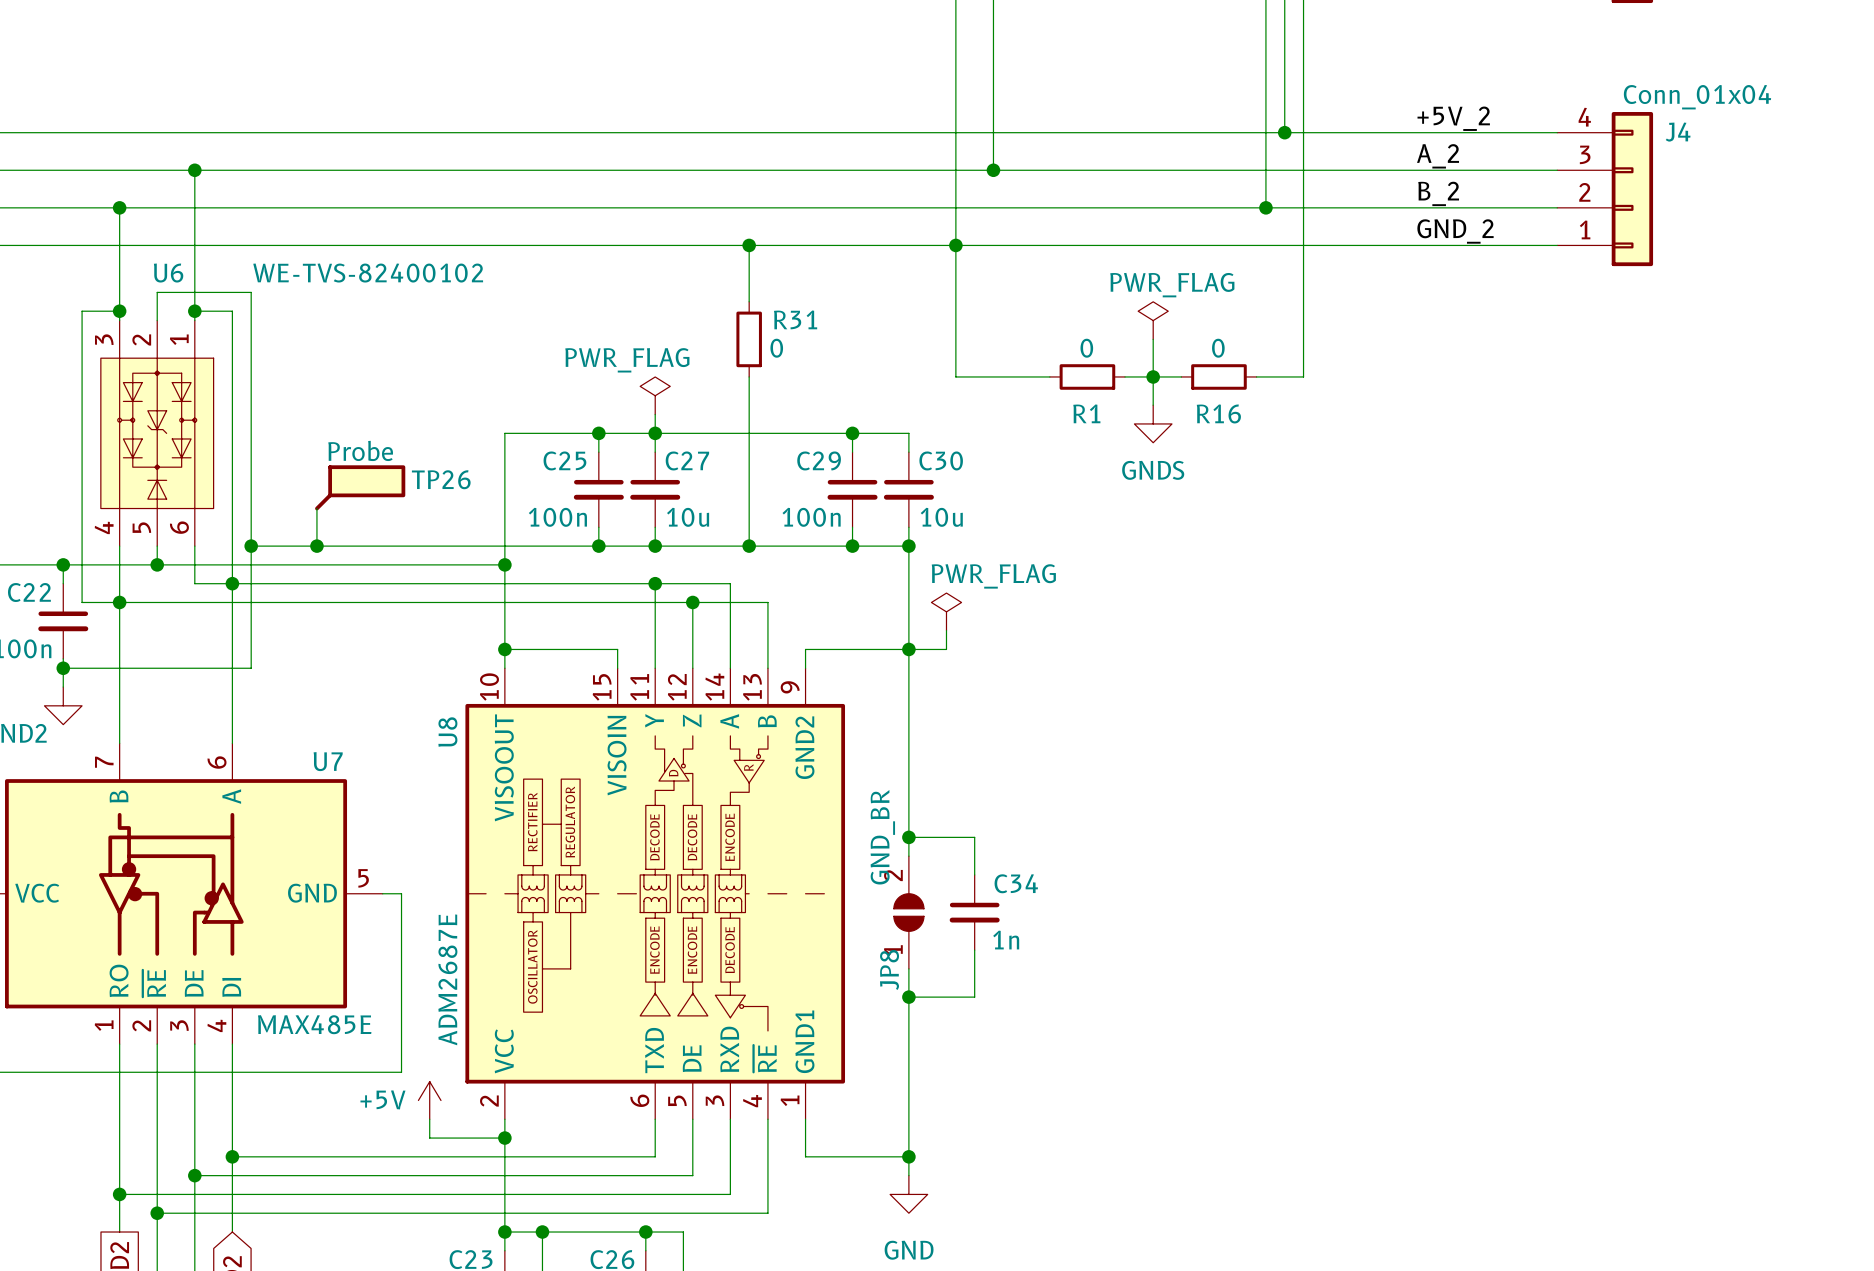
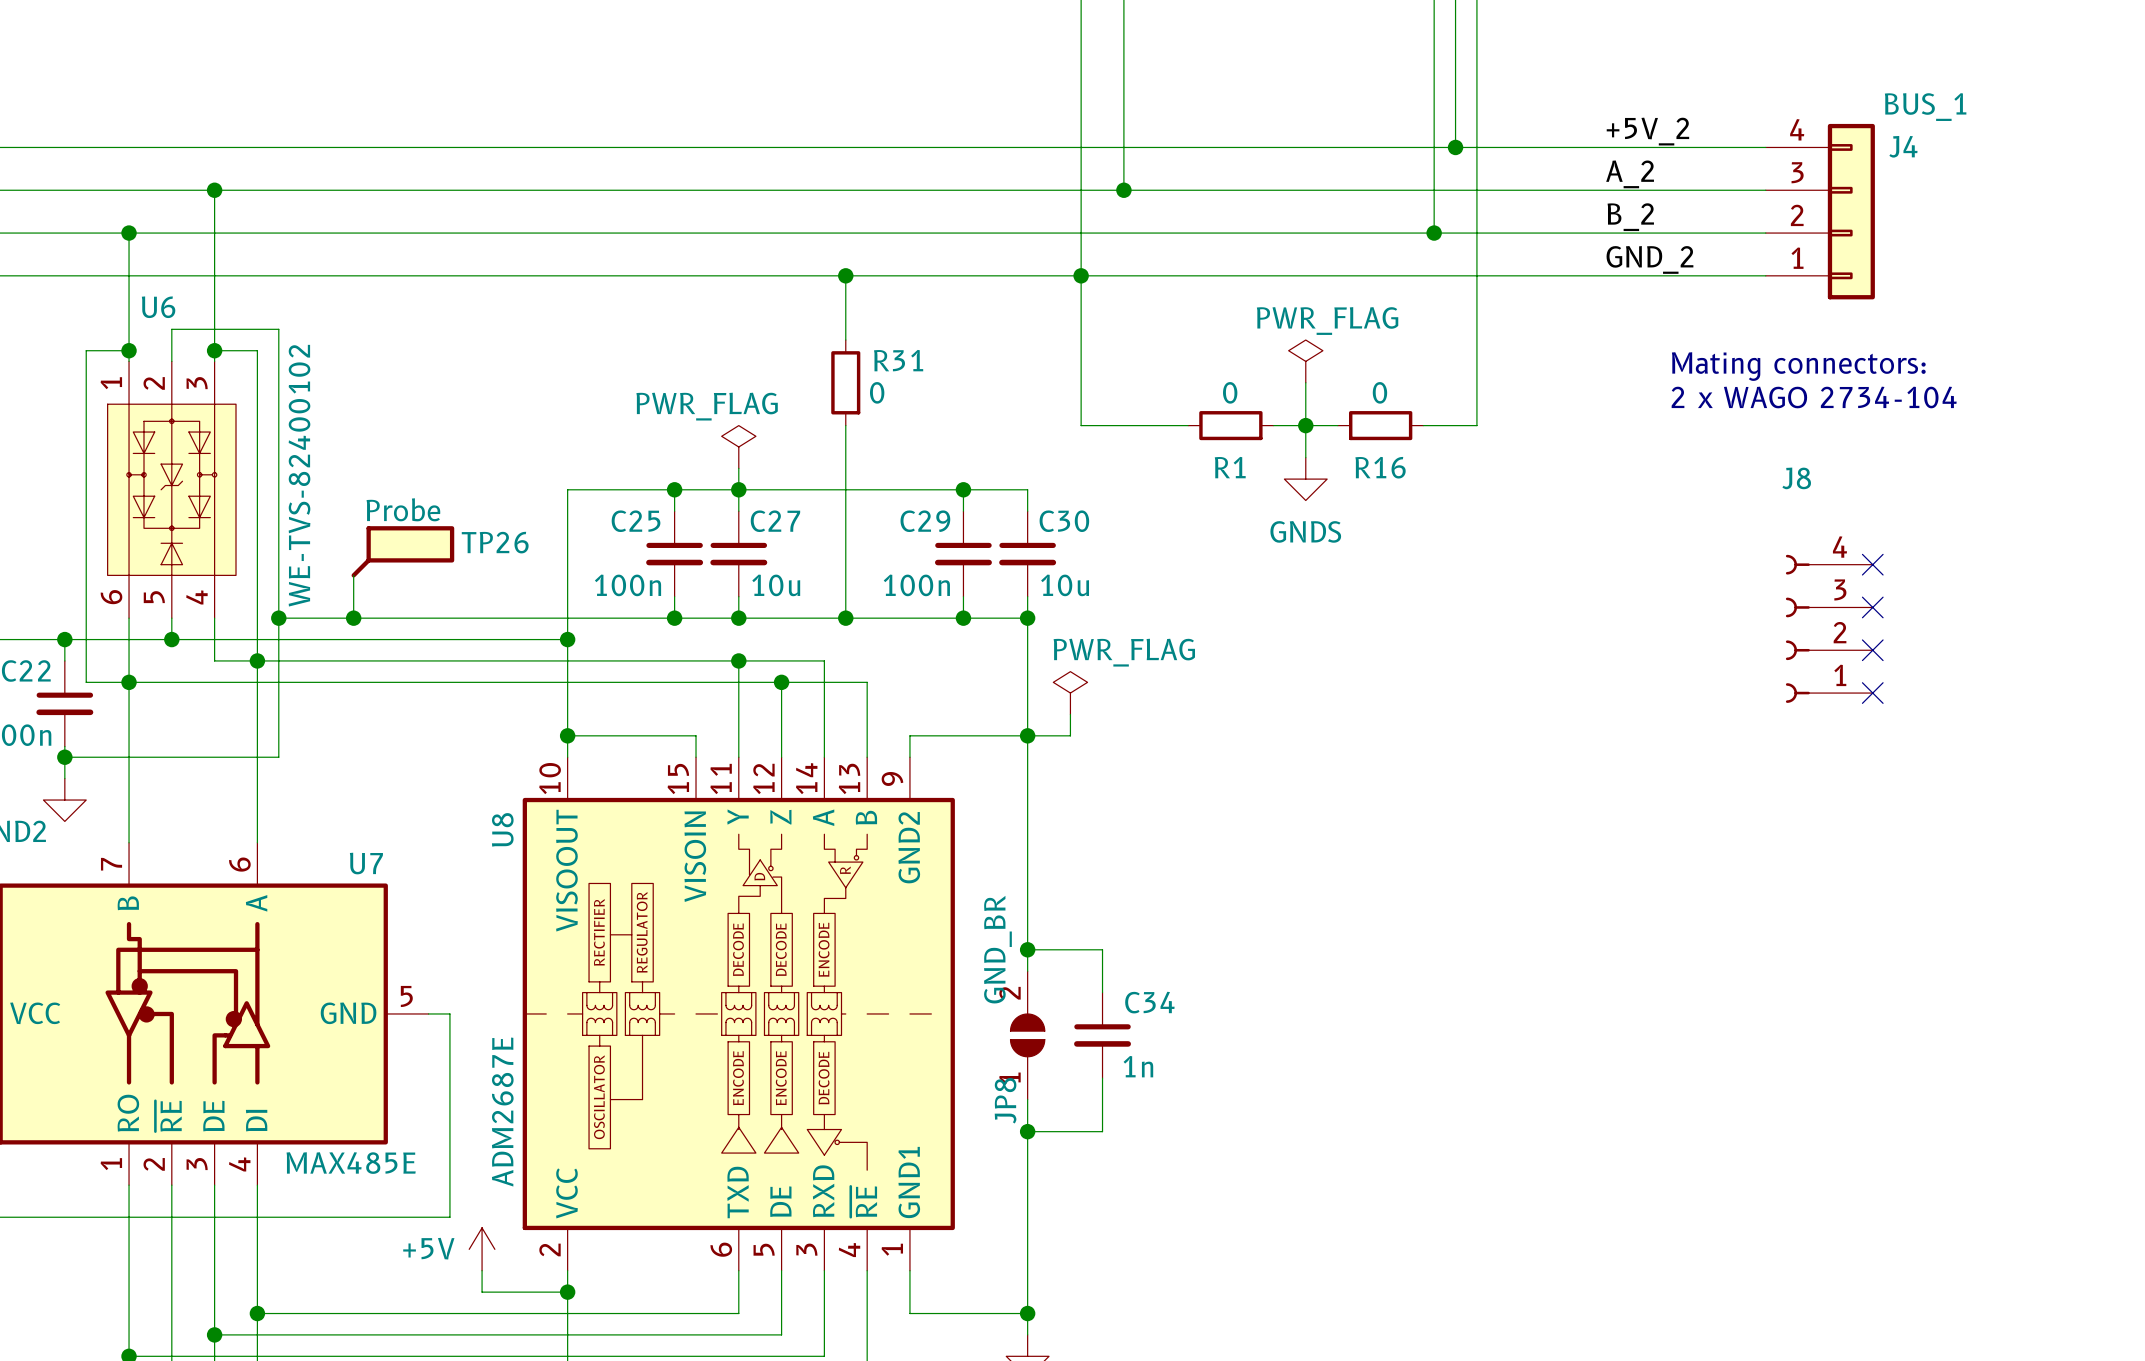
J4 value: Conn_01x04 (1697, 97) -> BUS_1 (1925, 107)
U6 value position: WE-TVS-82400102 (368, 273) -> WE-TVS-82400102 (299, 475)
text: none -> Mating connectors: (1798, 366)
text: none -> 2 x WAGO 2734-104 (1814, 397)
U6 flip: as is (157, 433) -> left-right (171, 489)
no-connect mark: none -> (1872, 564)
no-connect mark: none -> (1872, 607)
J8: none -> (1829, 628)
no-connect mark: none -> (1872, 650)
no-connect mark: none -> (1872, 693)

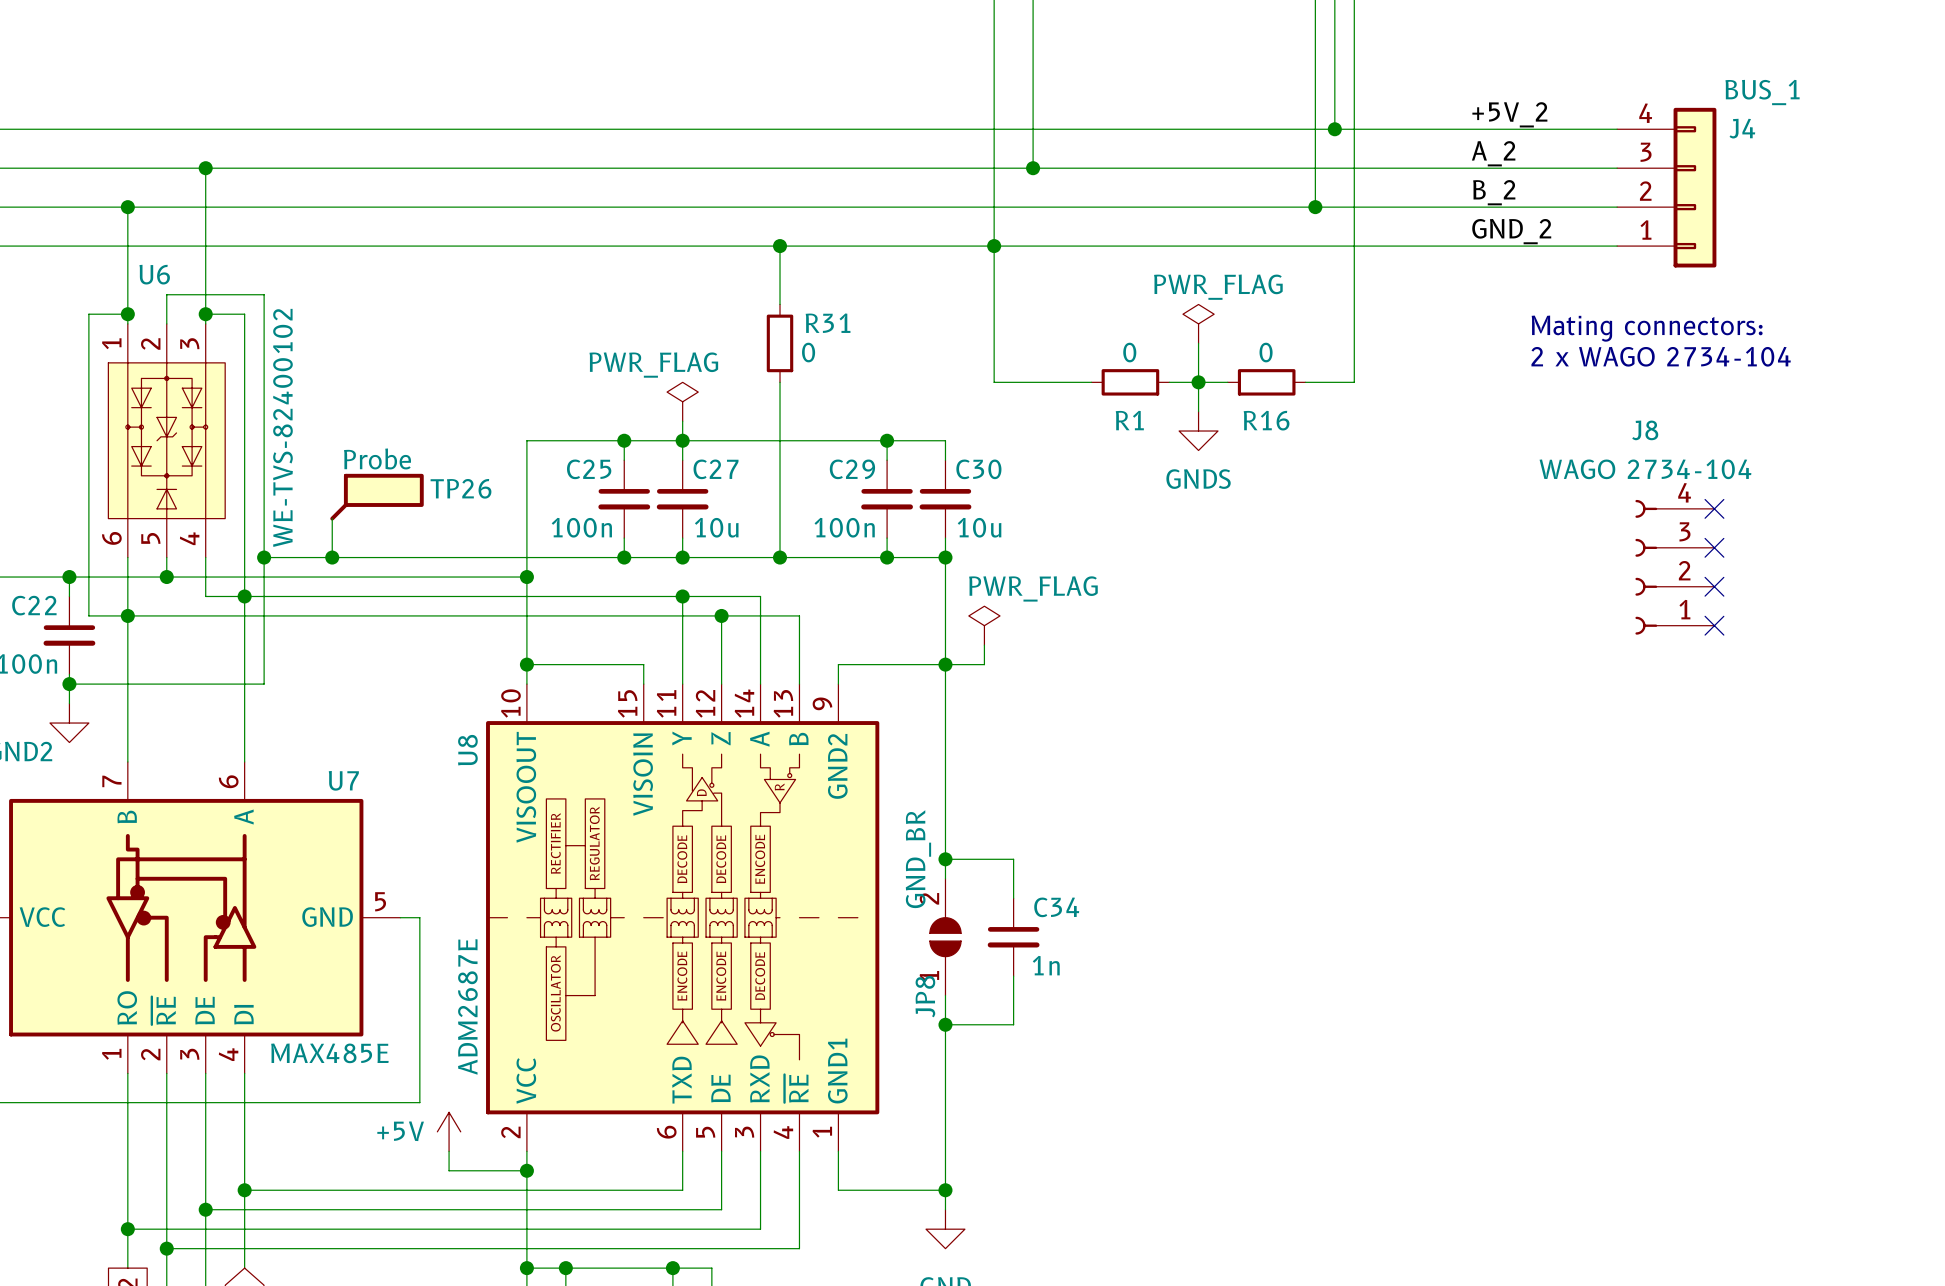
J8 value: none -> WAGO 2734-104 (1645, 469)

